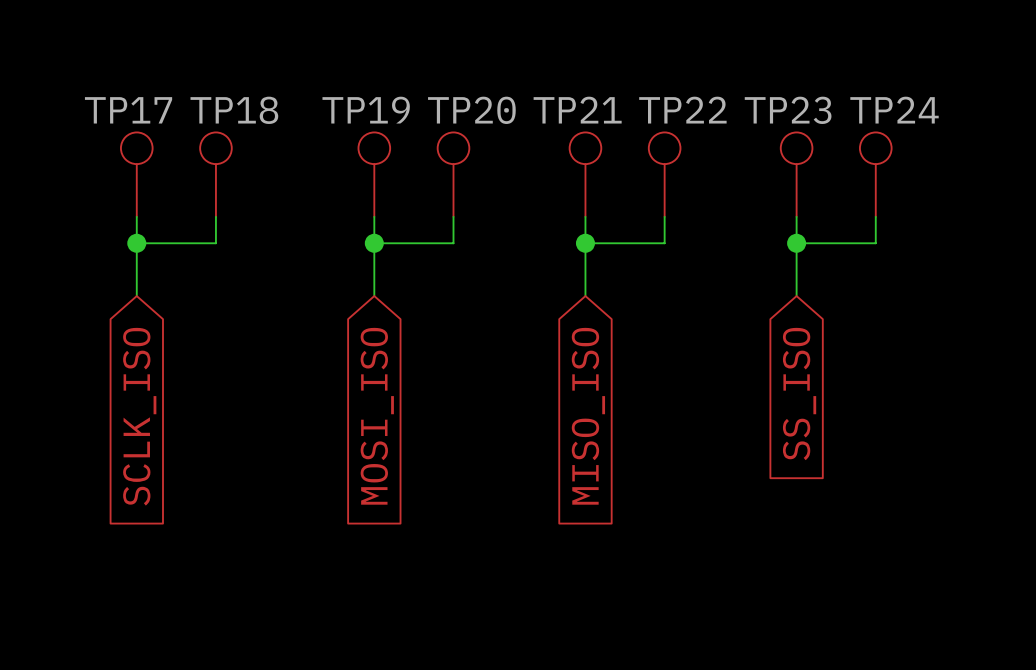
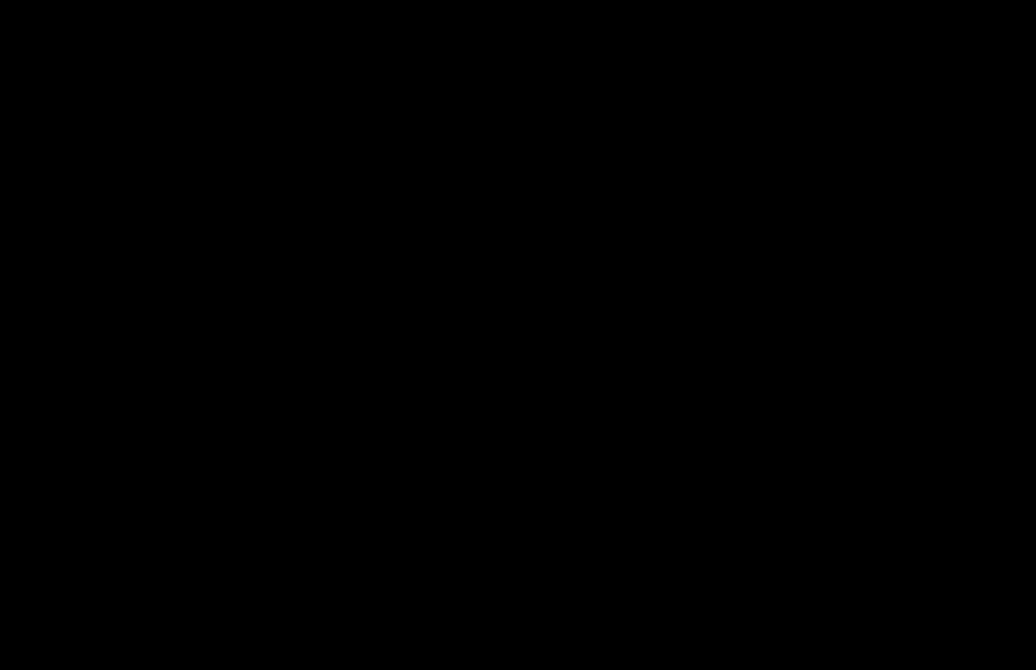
TP17: (136, 174) -> none
TP18: (215, 174) -> none
TP19: (374, 174) -> none
TP20: (453, 174) -> none
TP21: (585, 174) -> none
TP22: (664, 174) -> none
TP23: (796, 174) -> none
TP24: (875, 174) -> none
wire: (136, 216) (136, 296) -> none
wire: (215, 216) (215, 243) (136, 243) -> none
wire: (374, 216) (374, 296) -> none
wire: (453, 216) (453, 243) (374, 243) -> none
wire: (585, 216) (585, 296) -> none
wire: (664, 216) (664, 243) (585, 243) -> none
wire: (796, 216) (796, 296) -> none
wire: (875, 216) (875, 243) (796, 243) -> none
junction: (136, 243) -> none
junction: (374, 243) -> none
junction: (585, 243) -> none
junction: (796, 243) -> none
global label: SS_ISO (799, 394) -> none
global label: SCLK_ISO (139, 416) -> none
global label: MOSI_ISO (377, 416) -> none
global label: MISO_ISO (588, 416) -> none

